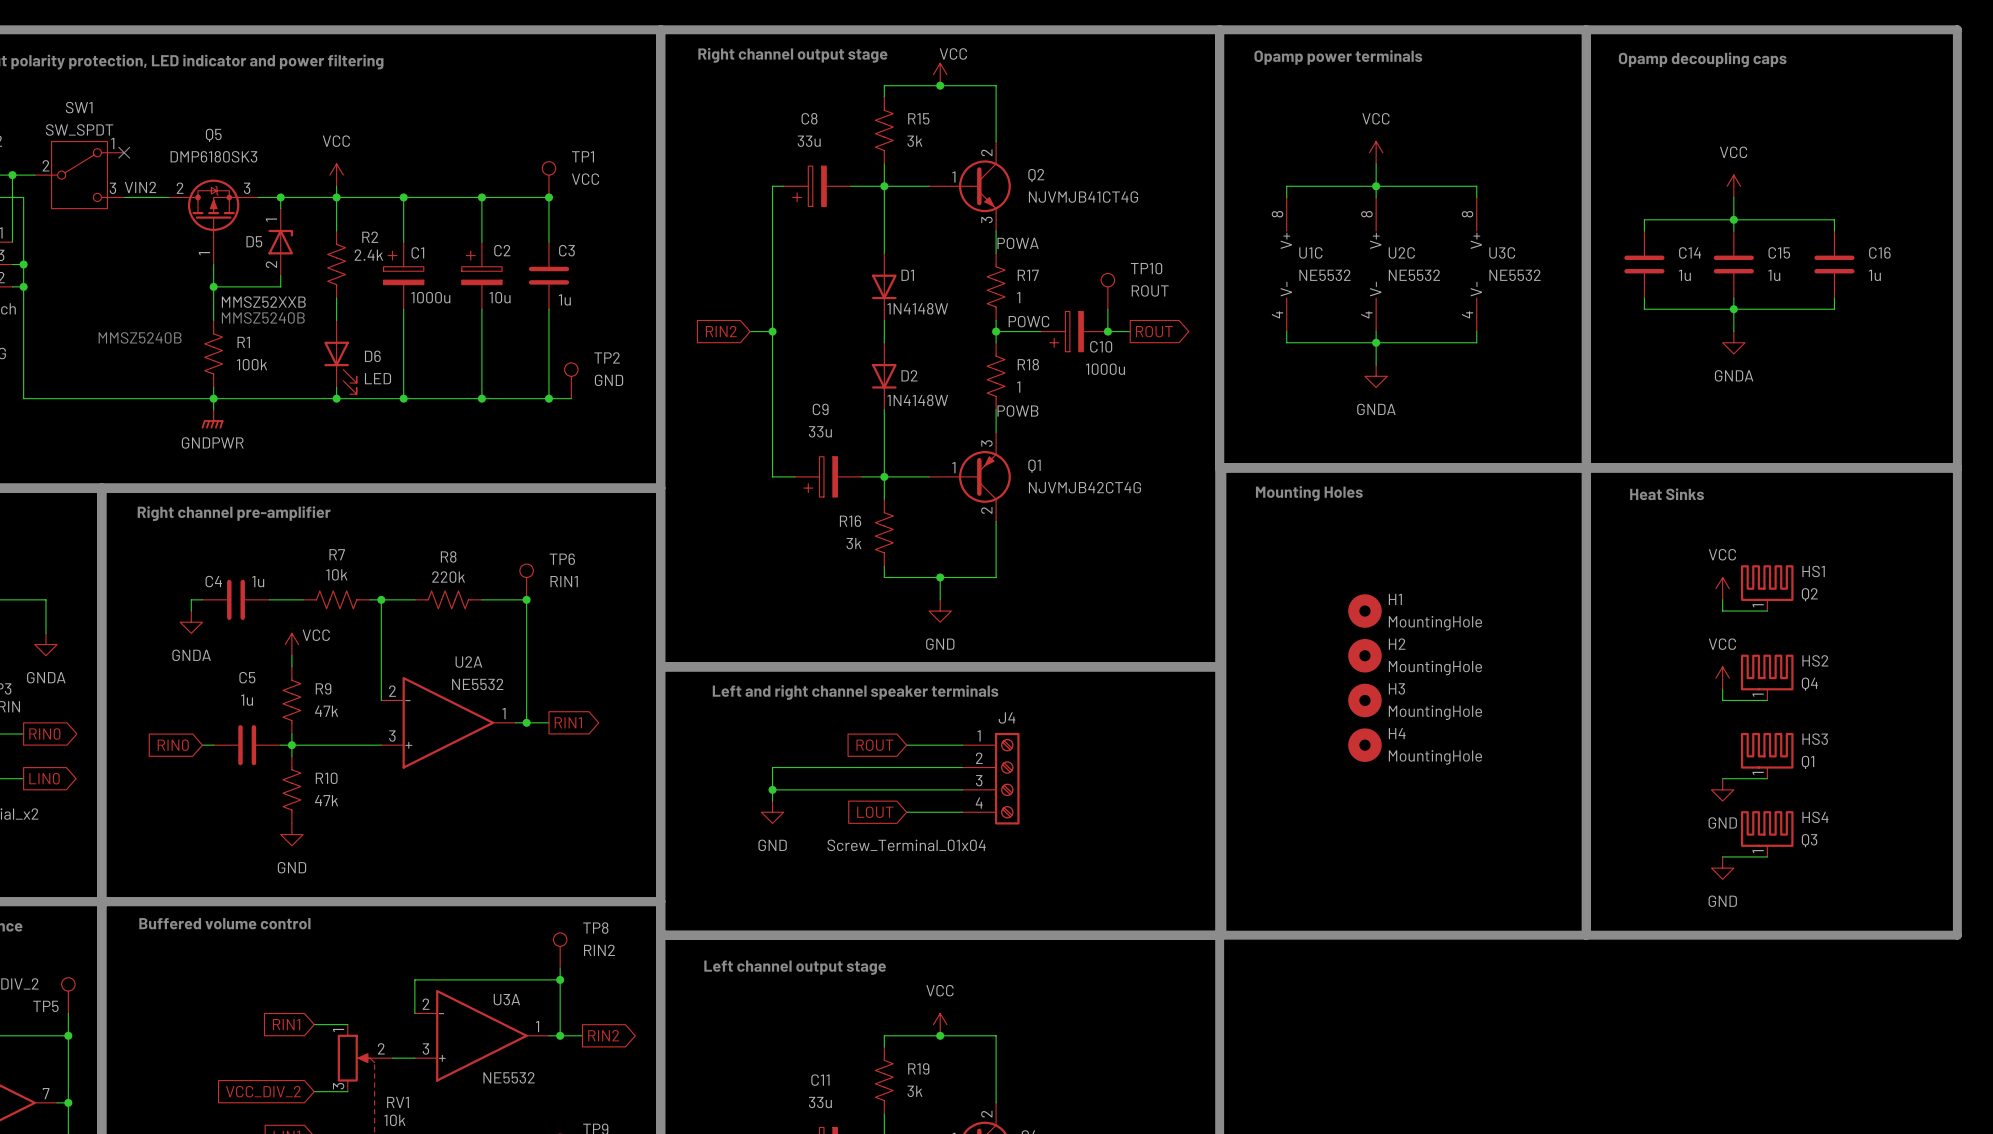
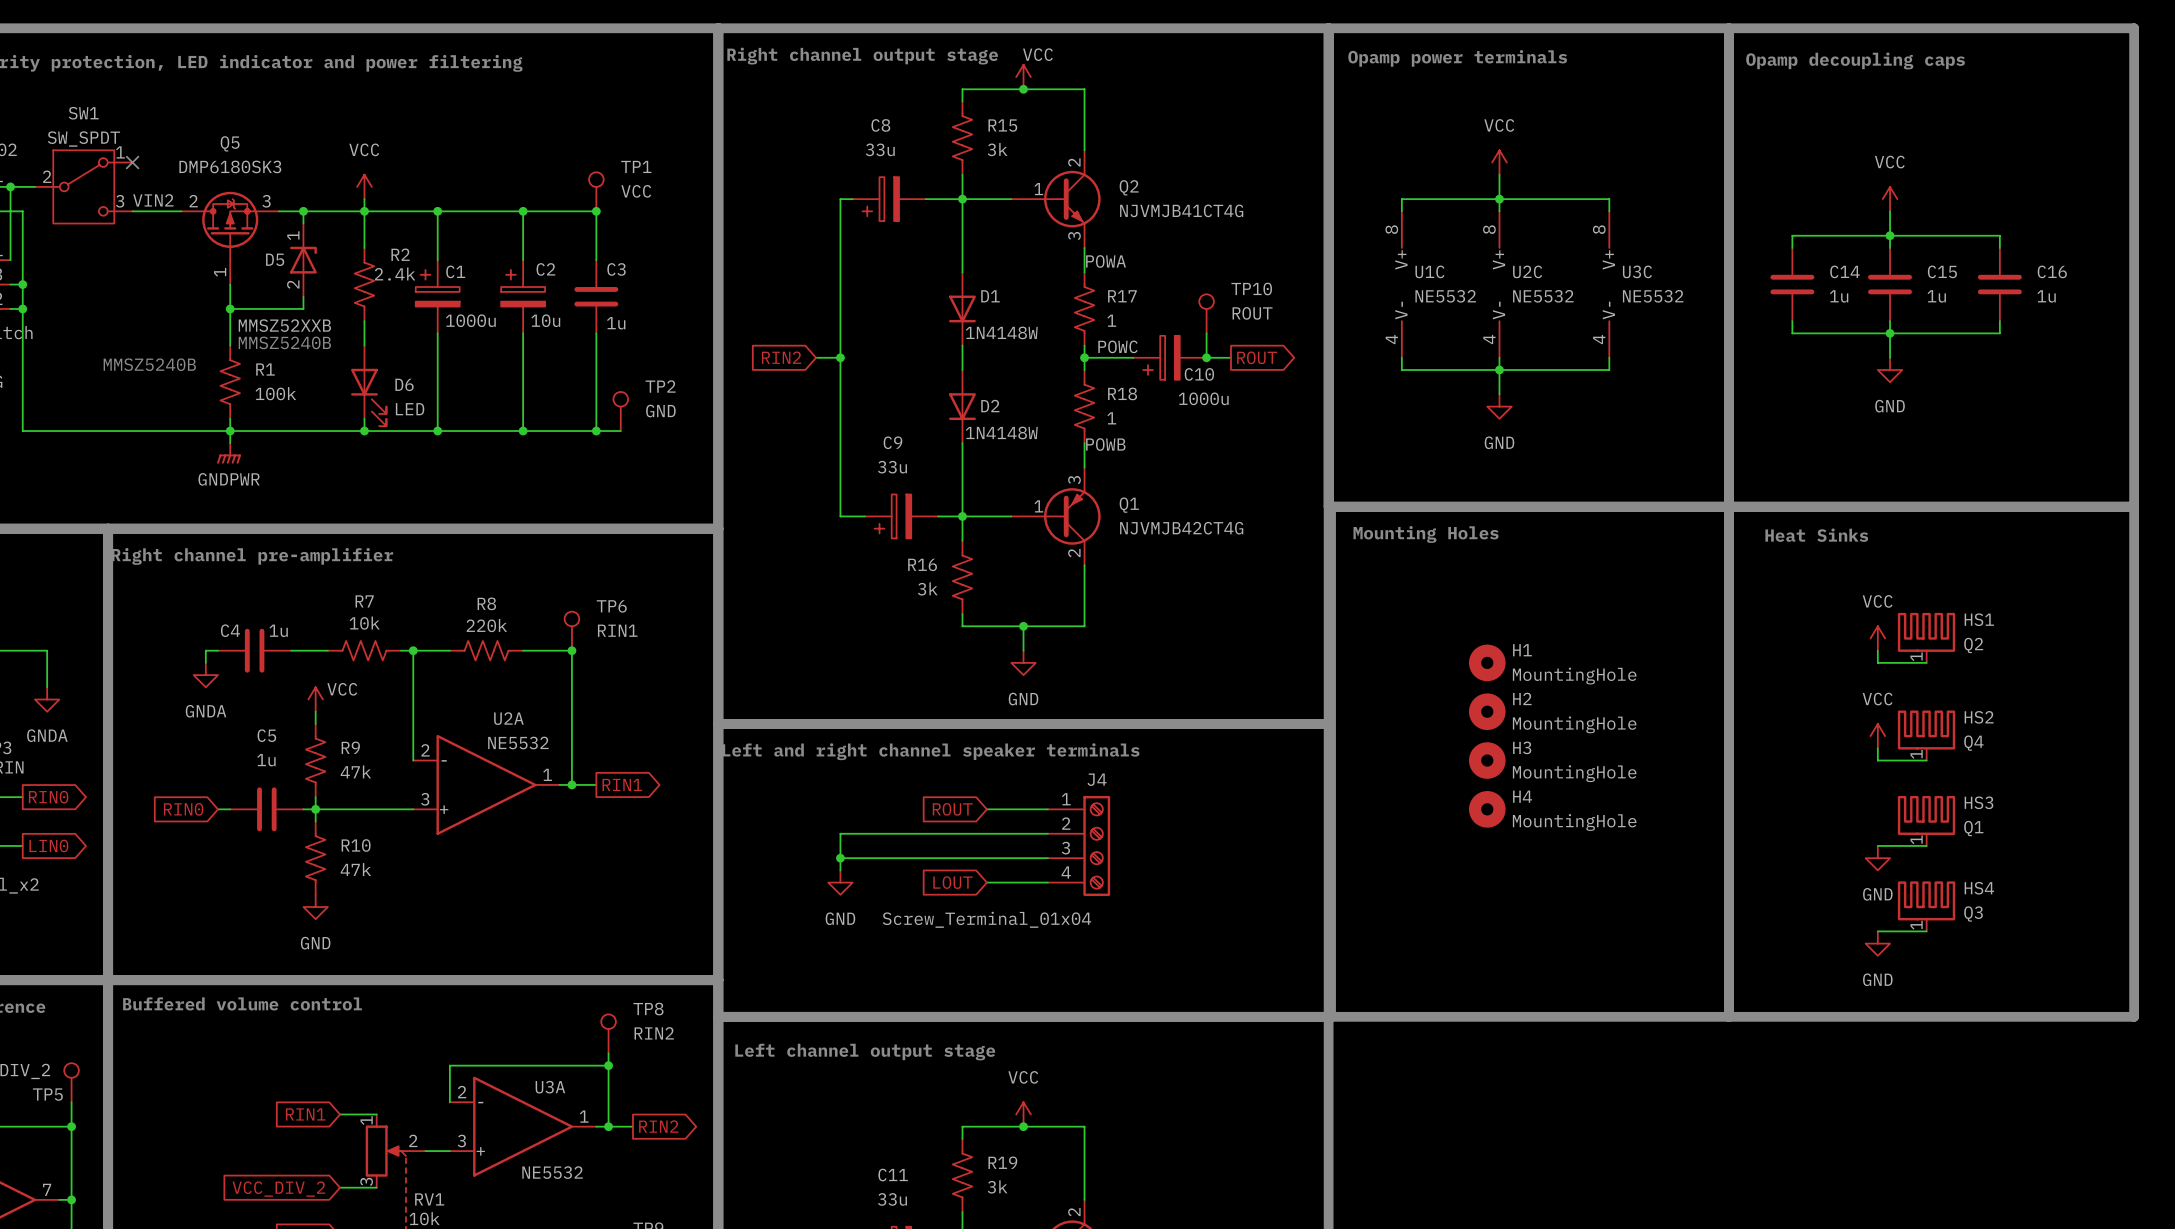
power symbol: GNDA (1733, 342) -> GND (1890, 369)
power symbol: GNDA (1376, 376) -> GND (1499, 406)

